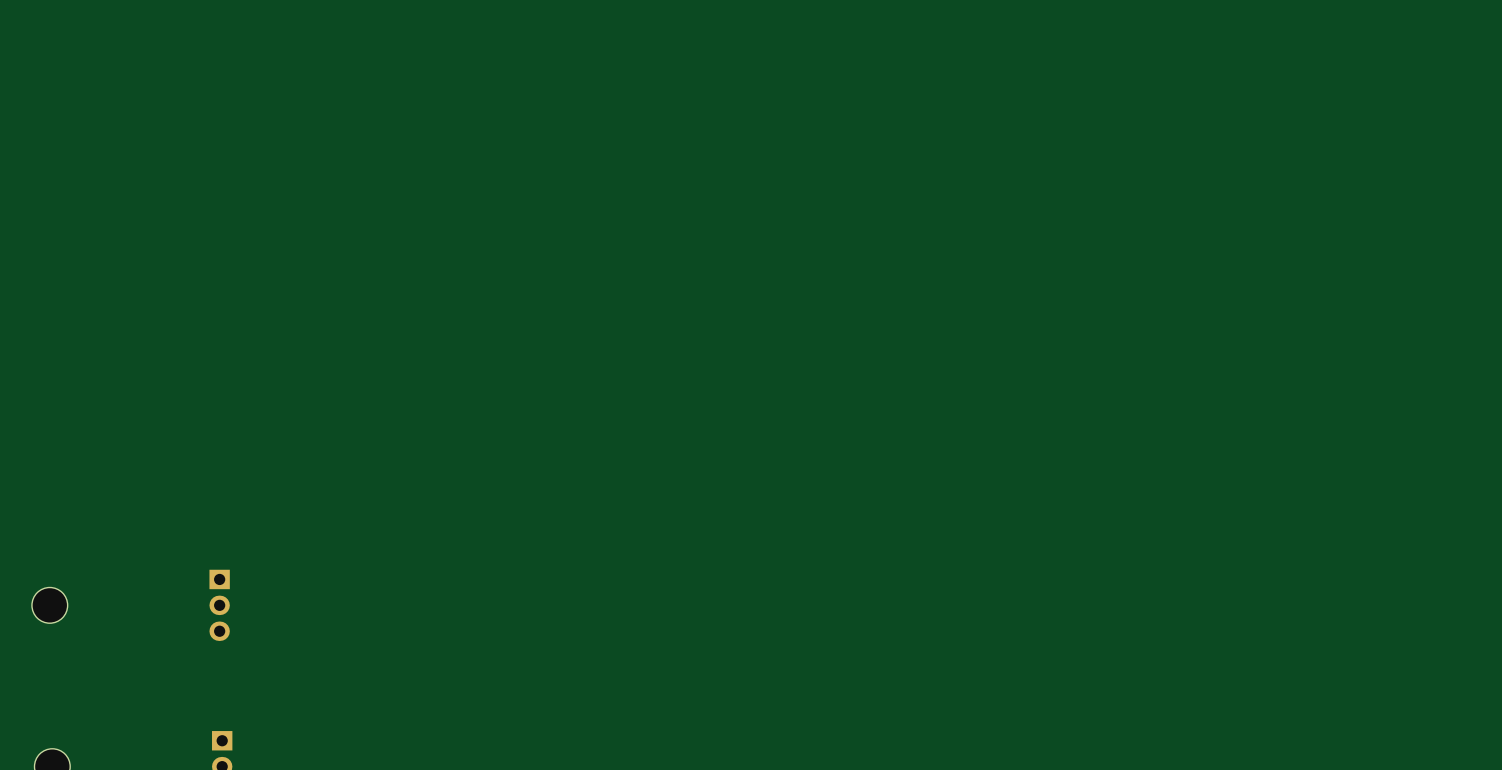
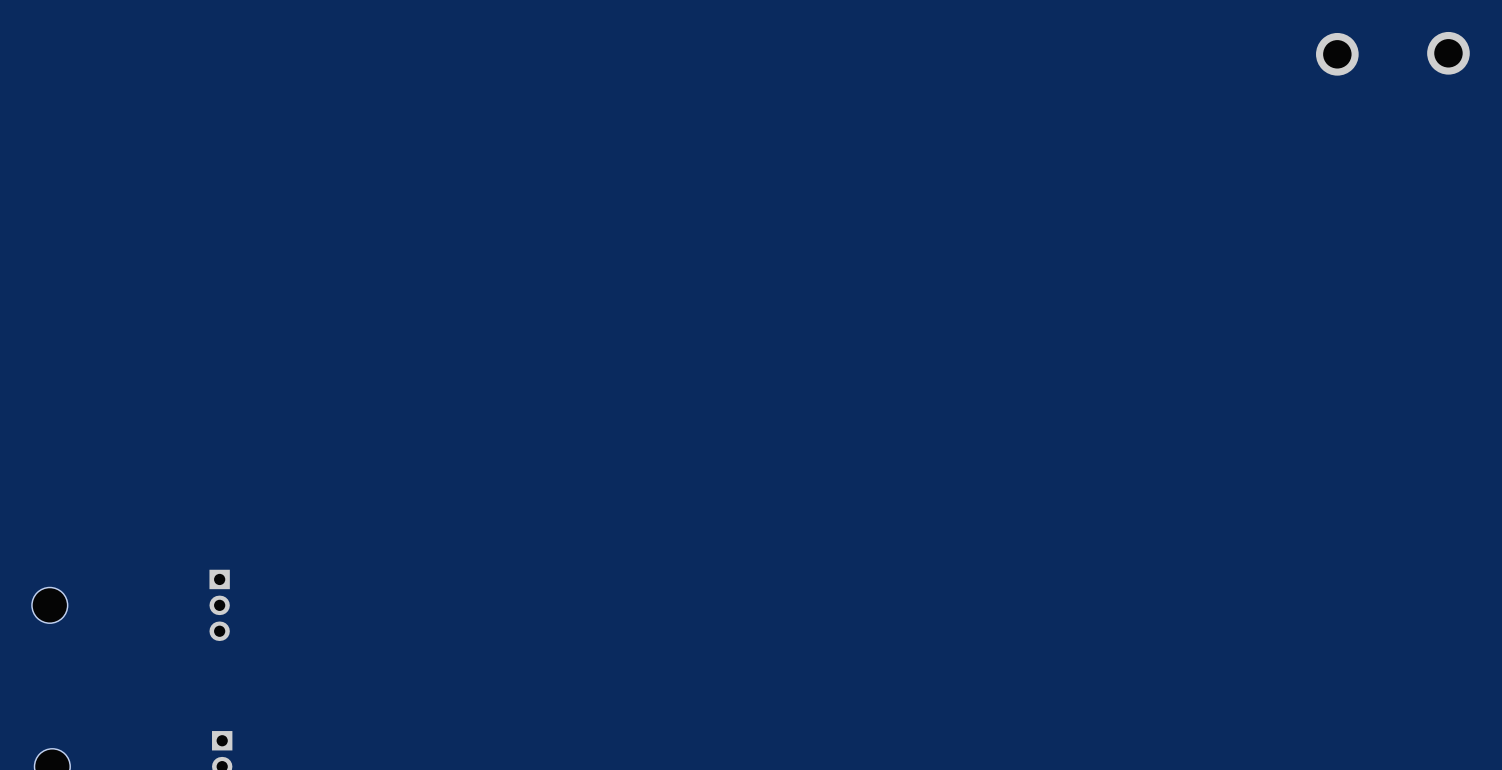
part: none -> (1448, 53)
part: none -> (1337, 54)

